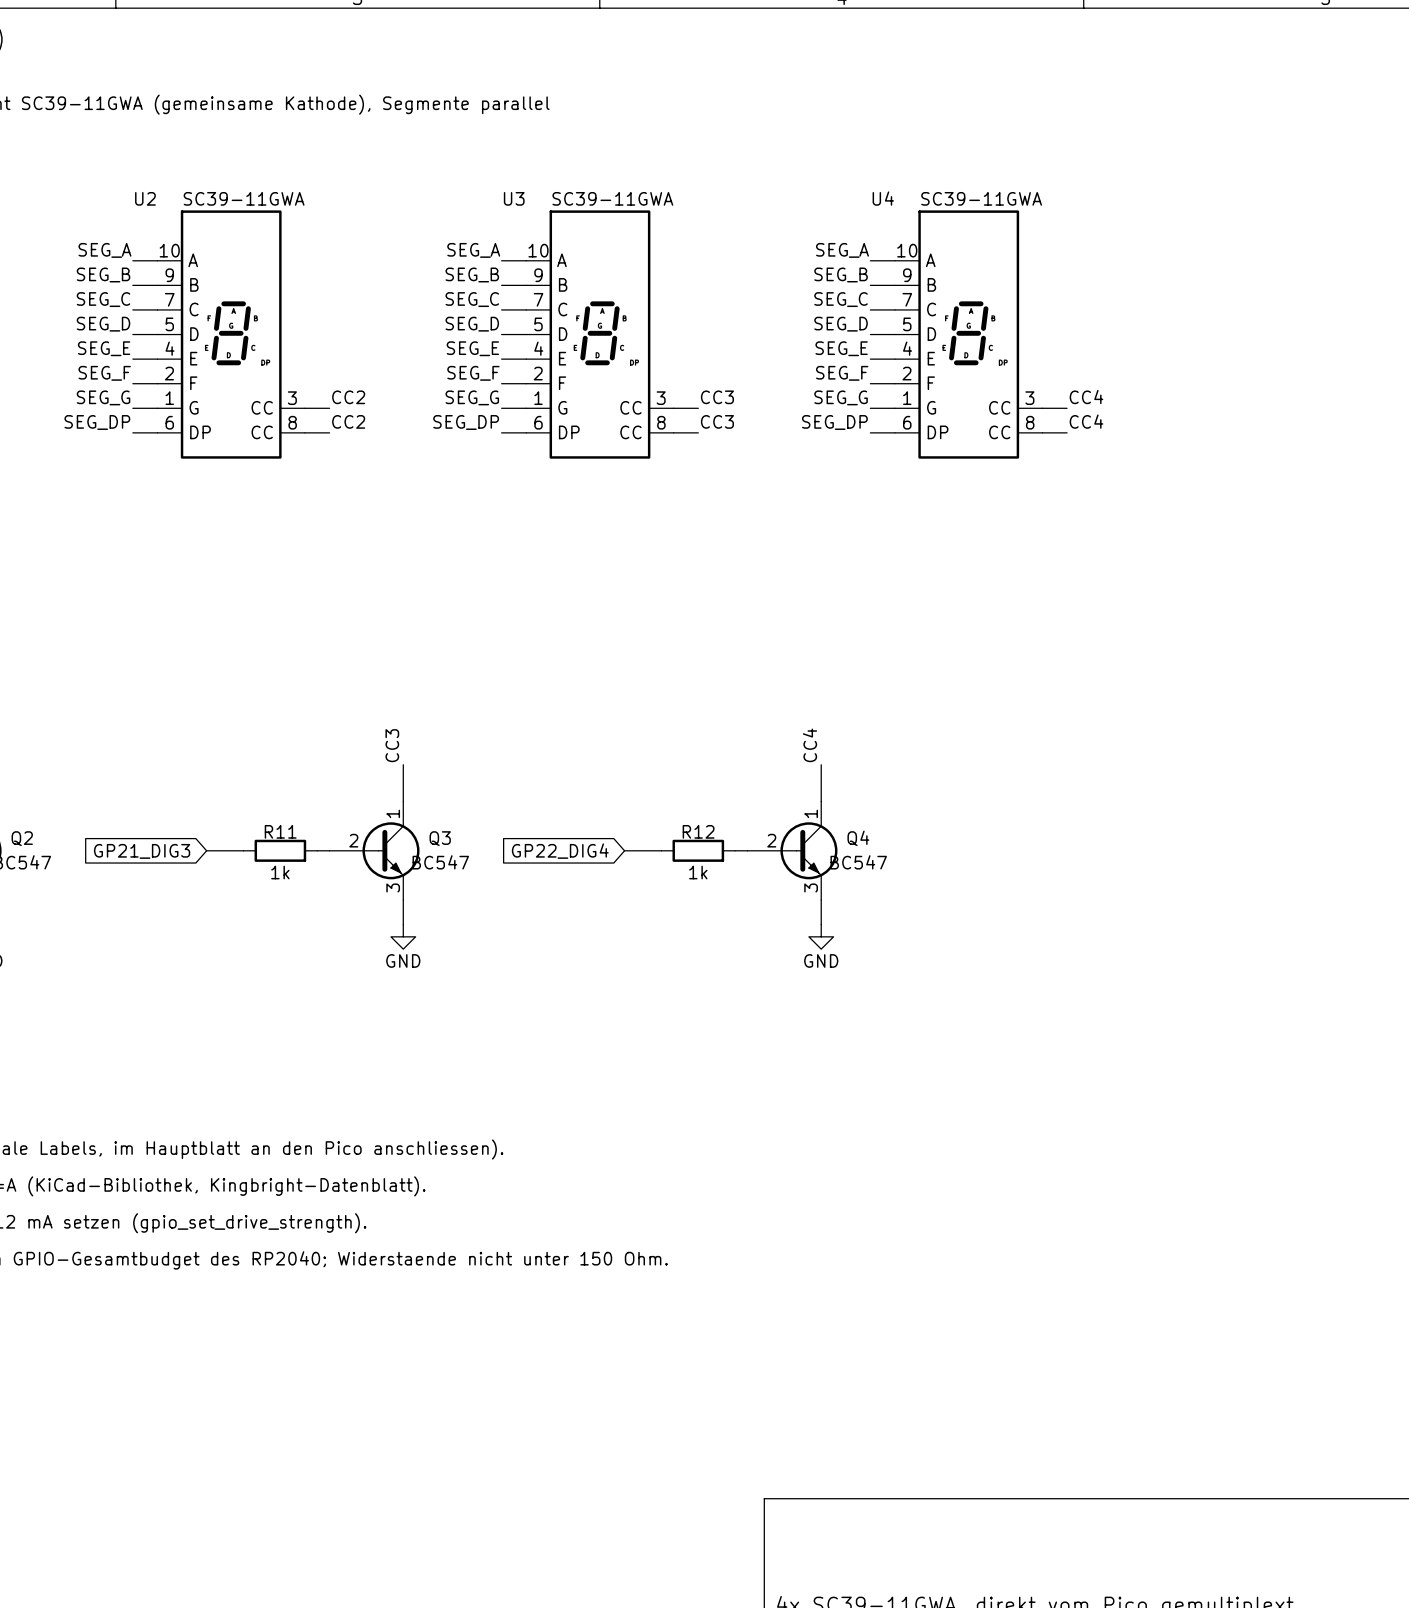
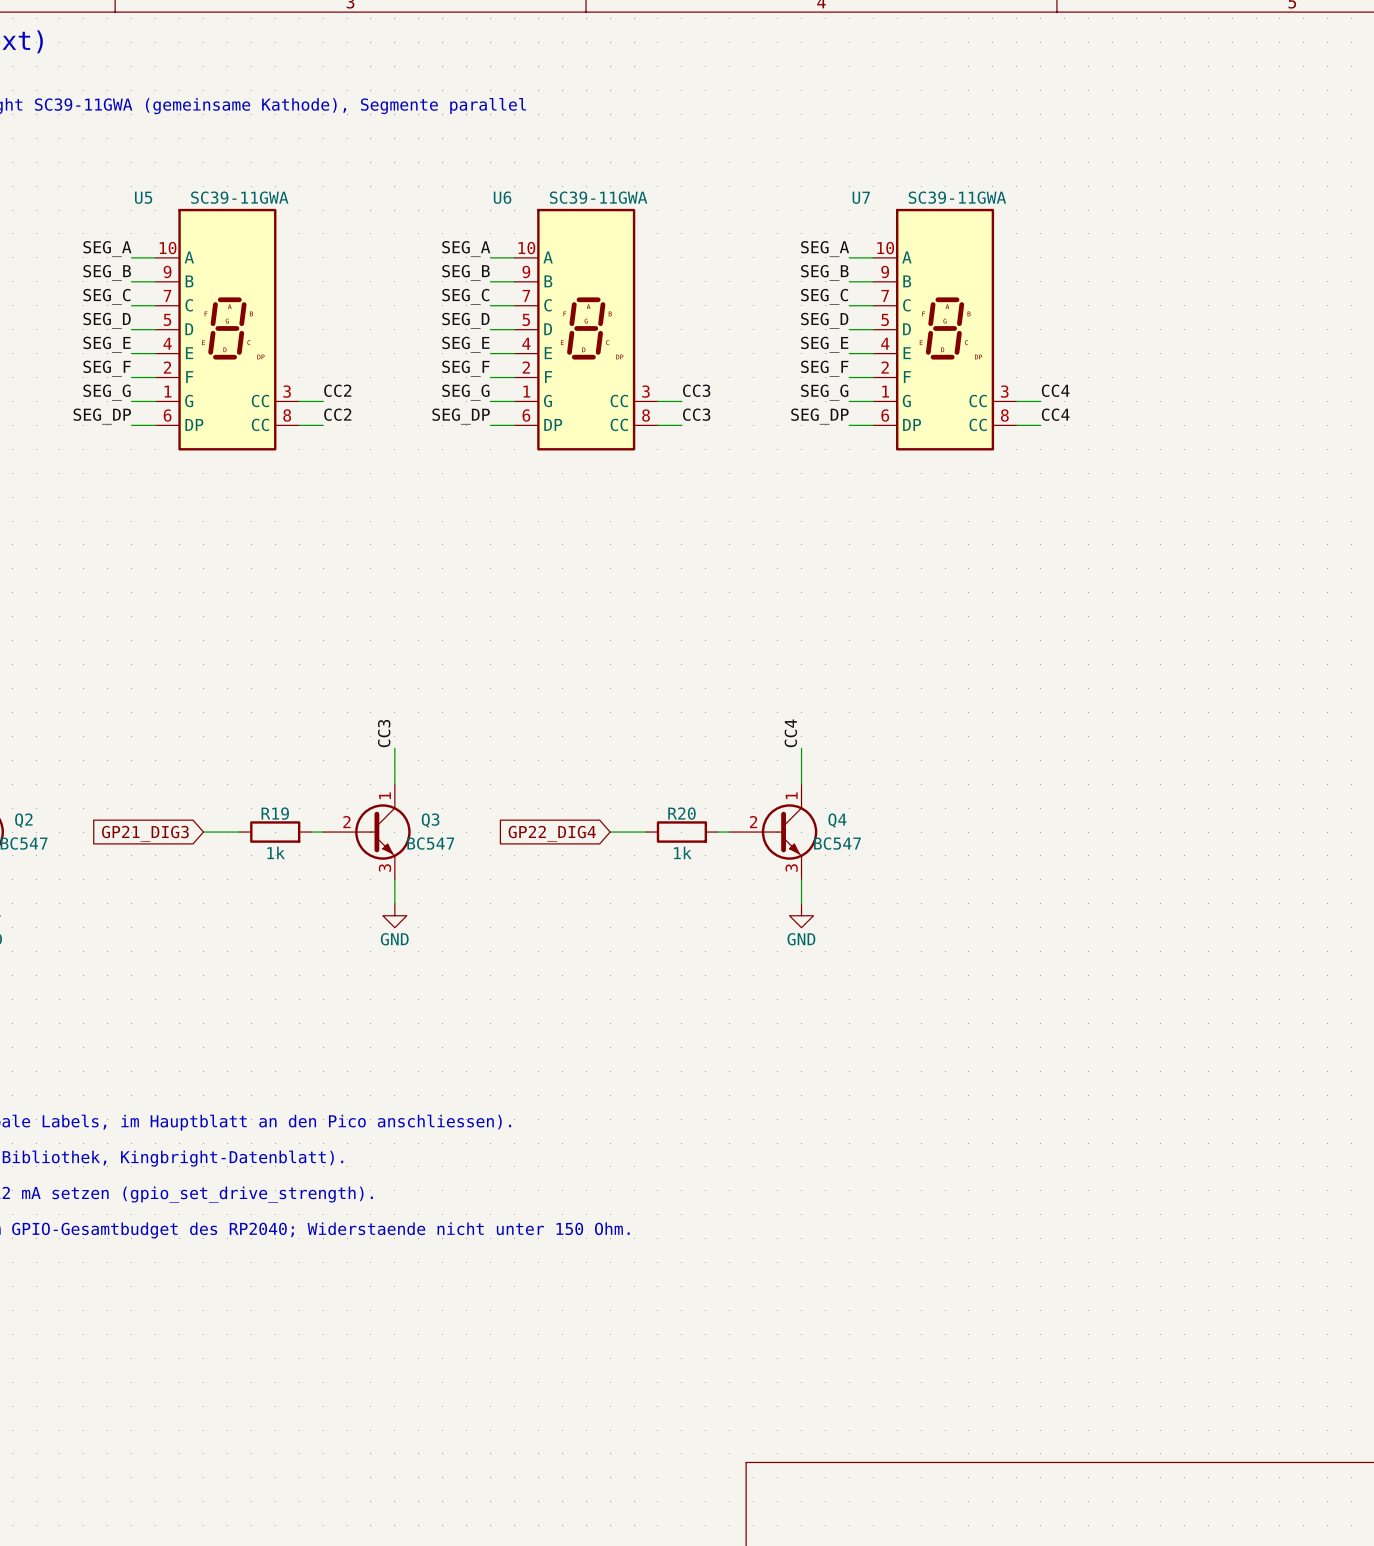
U2 name: U2 (145, 198) -> U5 (143, 197)
U3 name: U3 (514, 198) -> U6 (502, 197)
U4 name: U4 (883, 198) -> U7 (861, 197)
R11 name: R11 (280, 831) -> R19 (275, 813)
R12 name: R12 (698, 831) -> R20 (681, 813)

